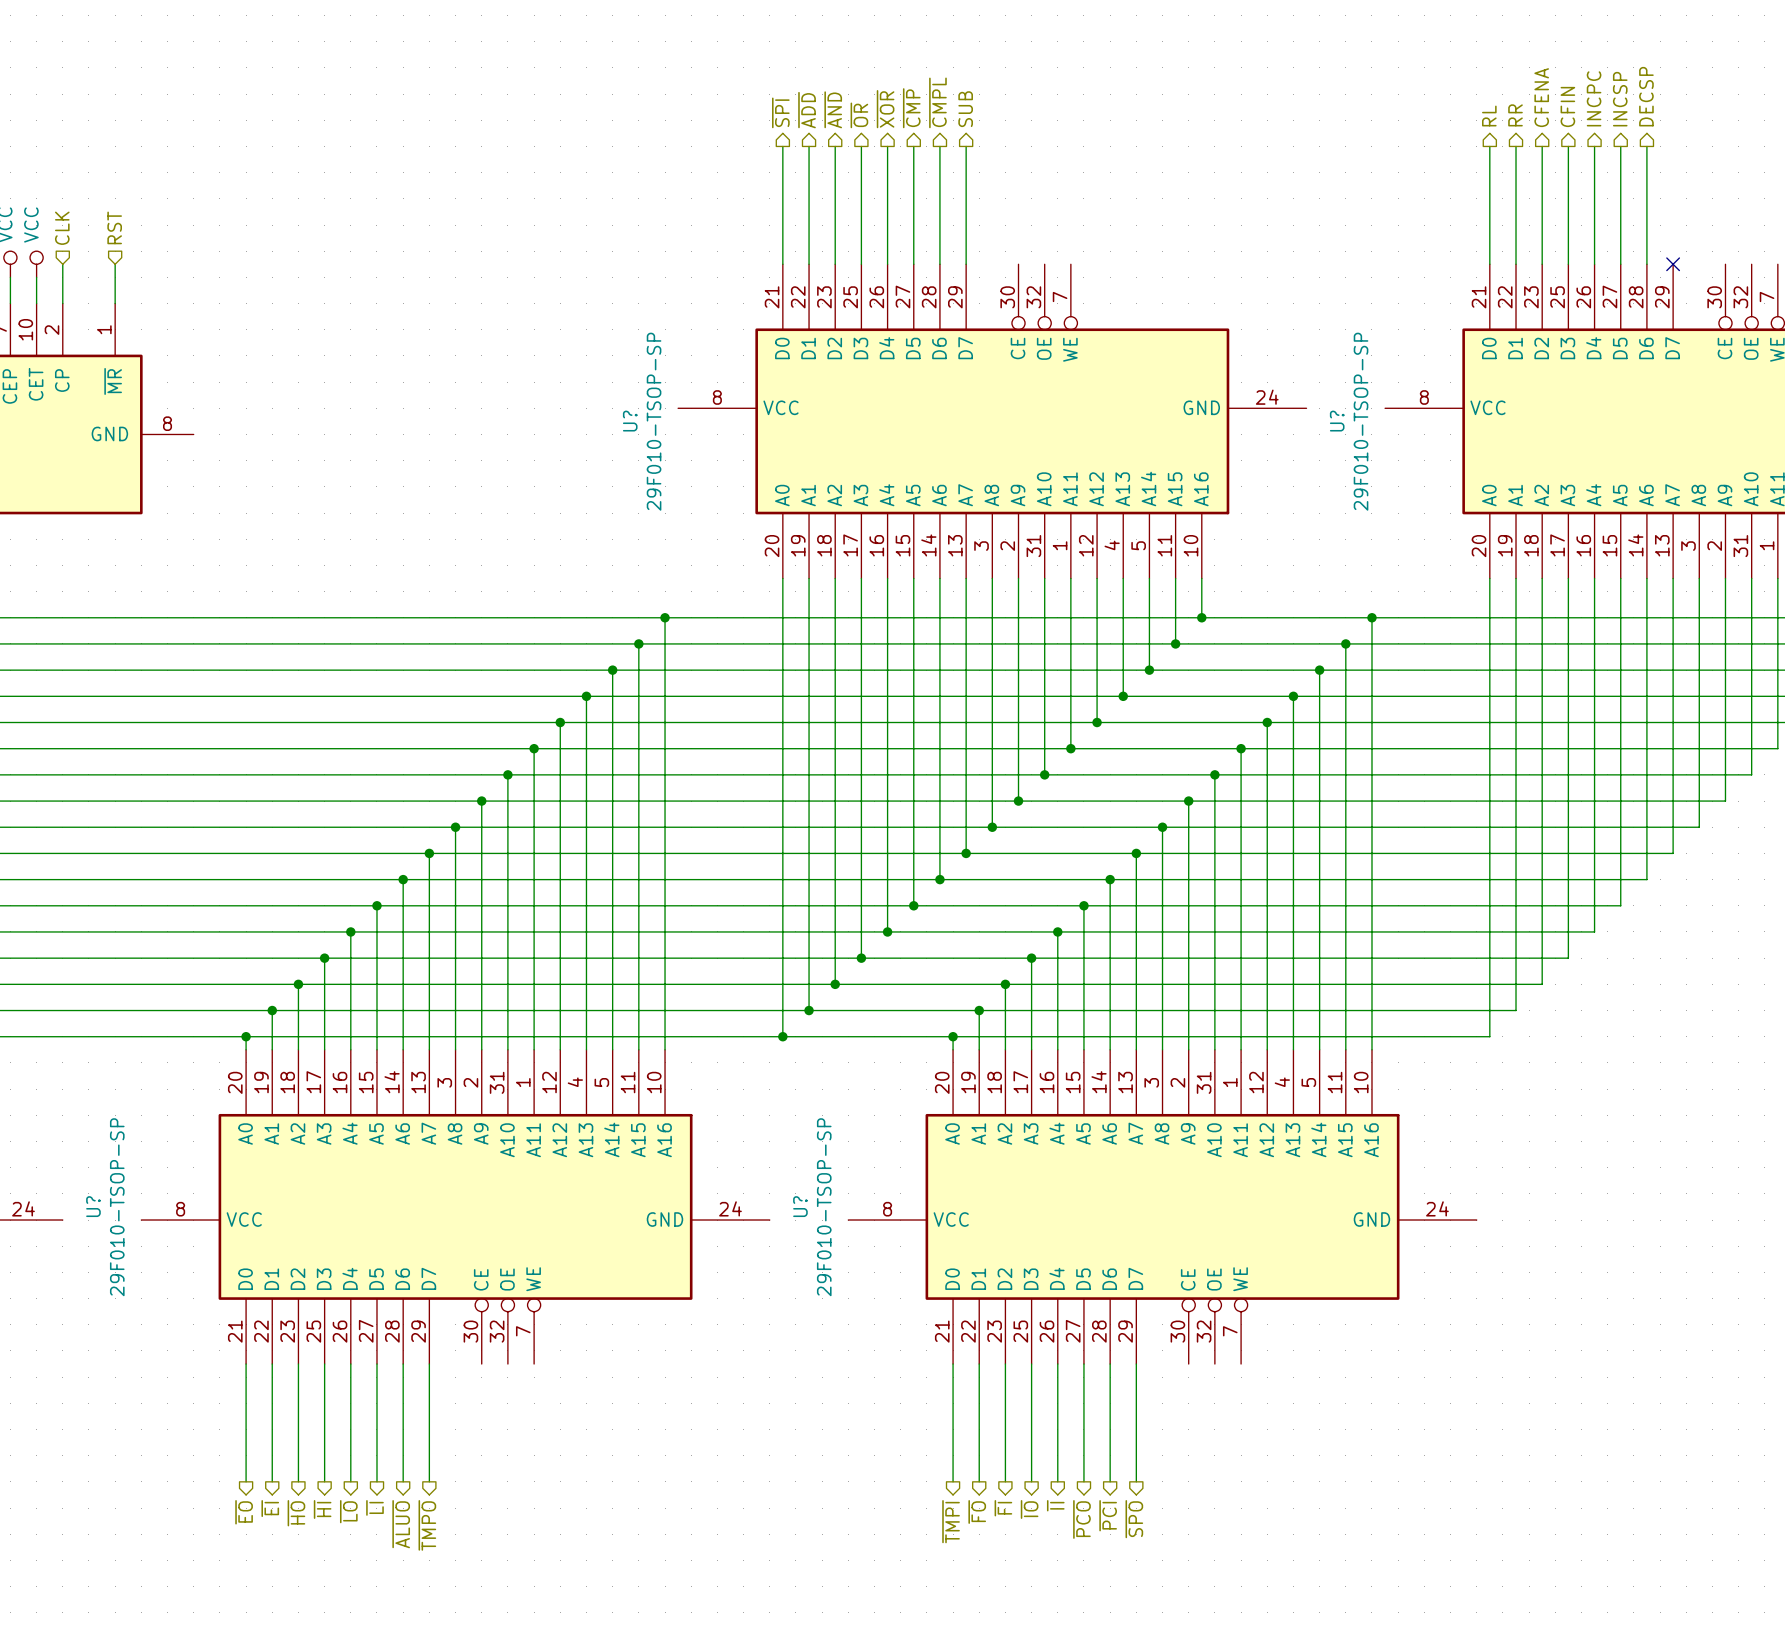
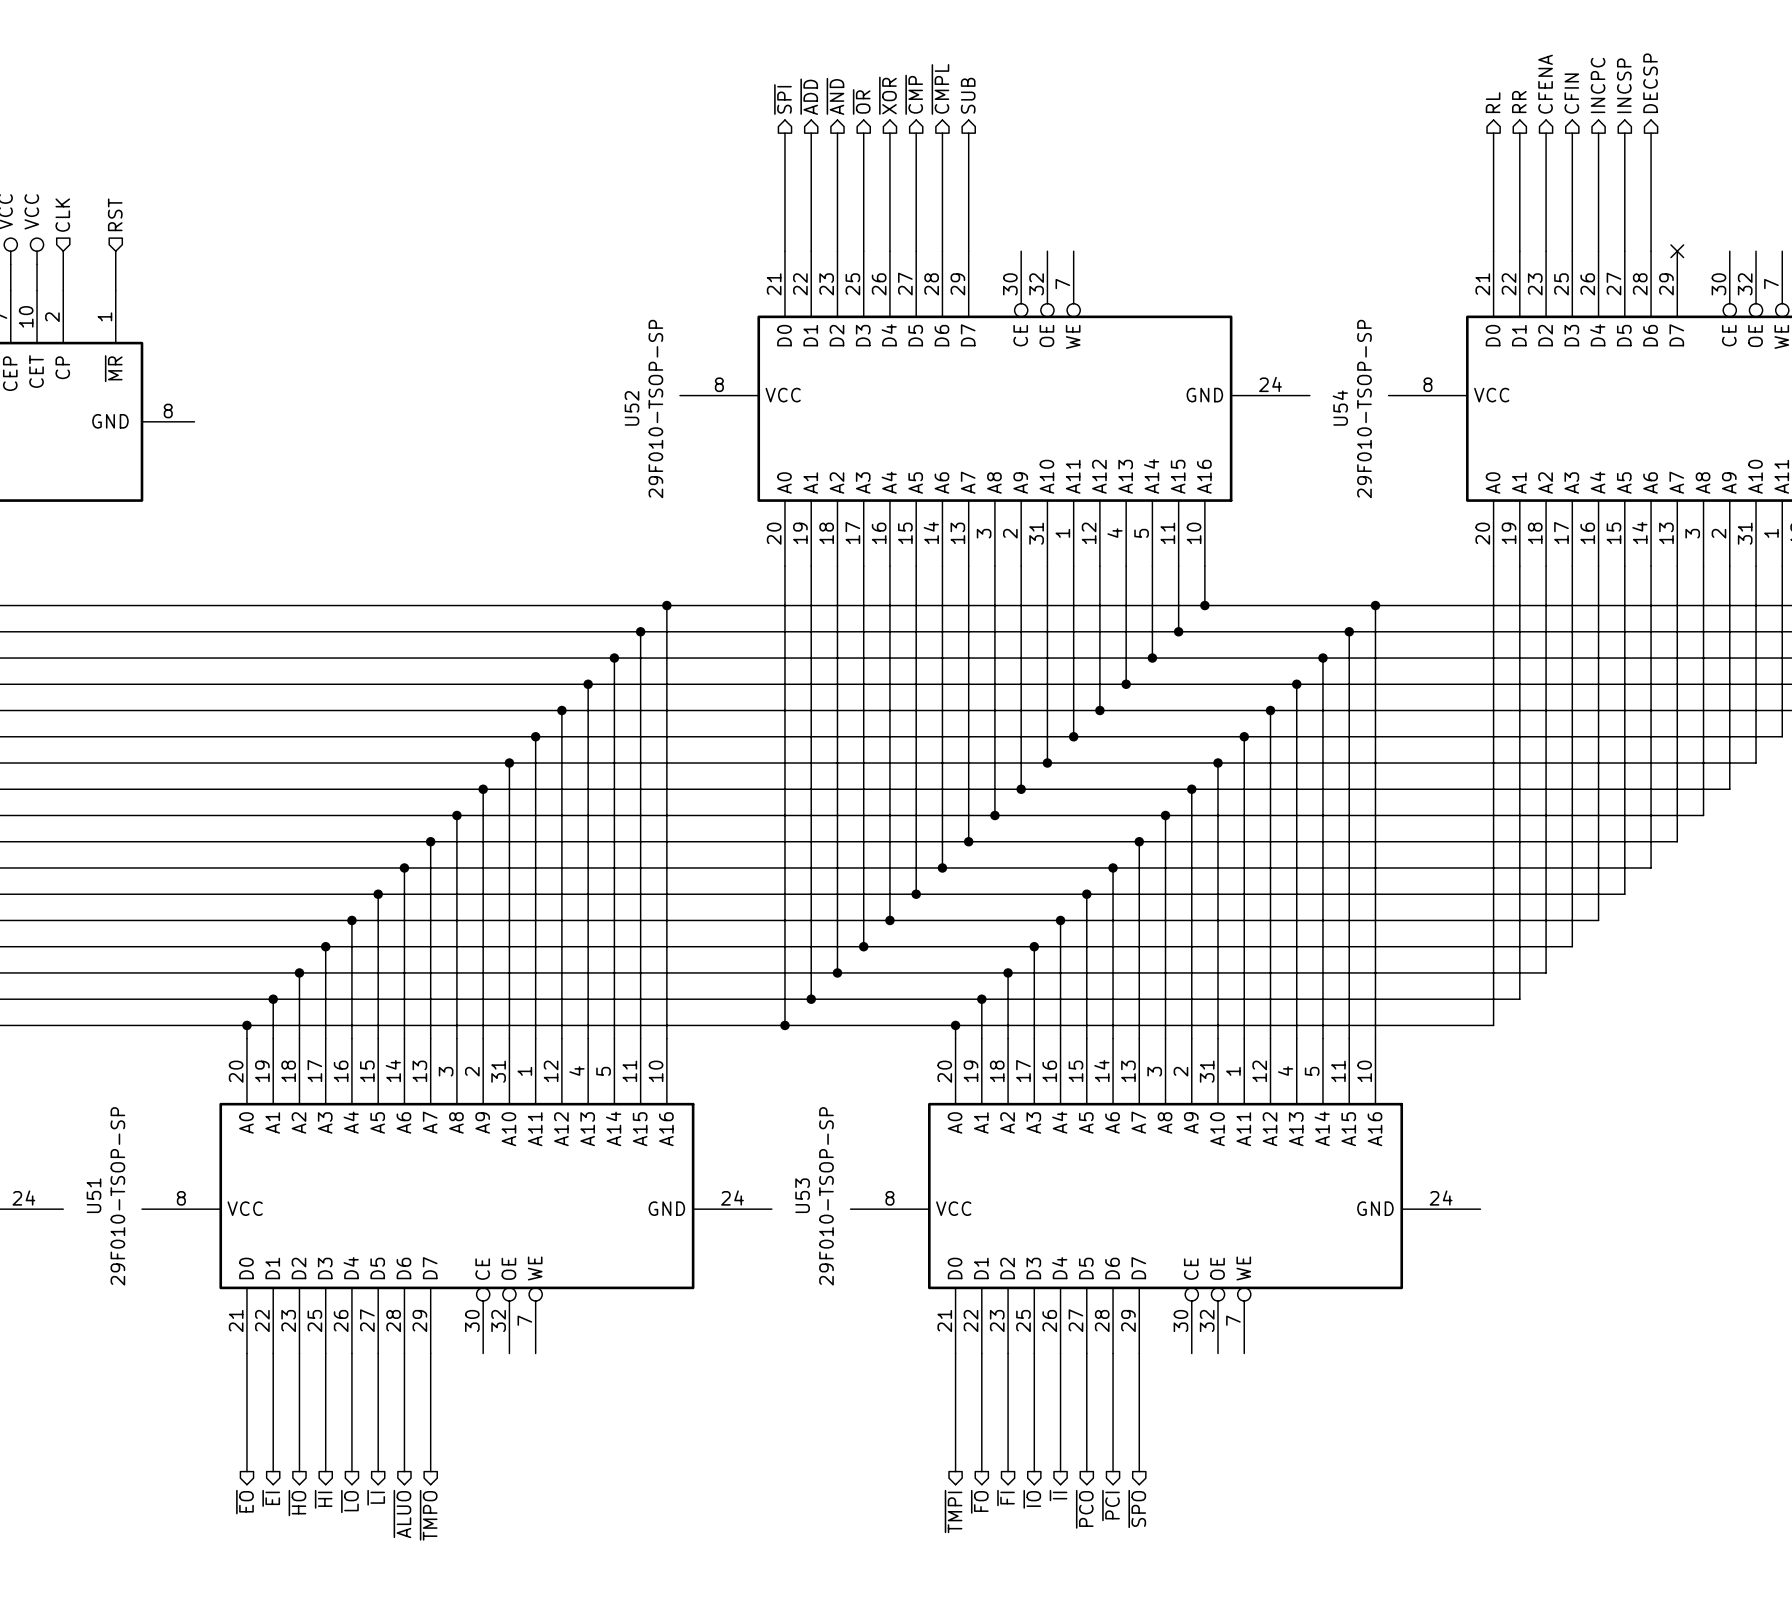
U? name: U? (630, 421) -> U52 (632, 408)
U? name: U? (1337, 421) -> U54 (1340, 408)
U? name: U? (93, 1206) -> U51 (94, 1195)
U? name: U? (800, 1206) -> U53 (802, 1195)

